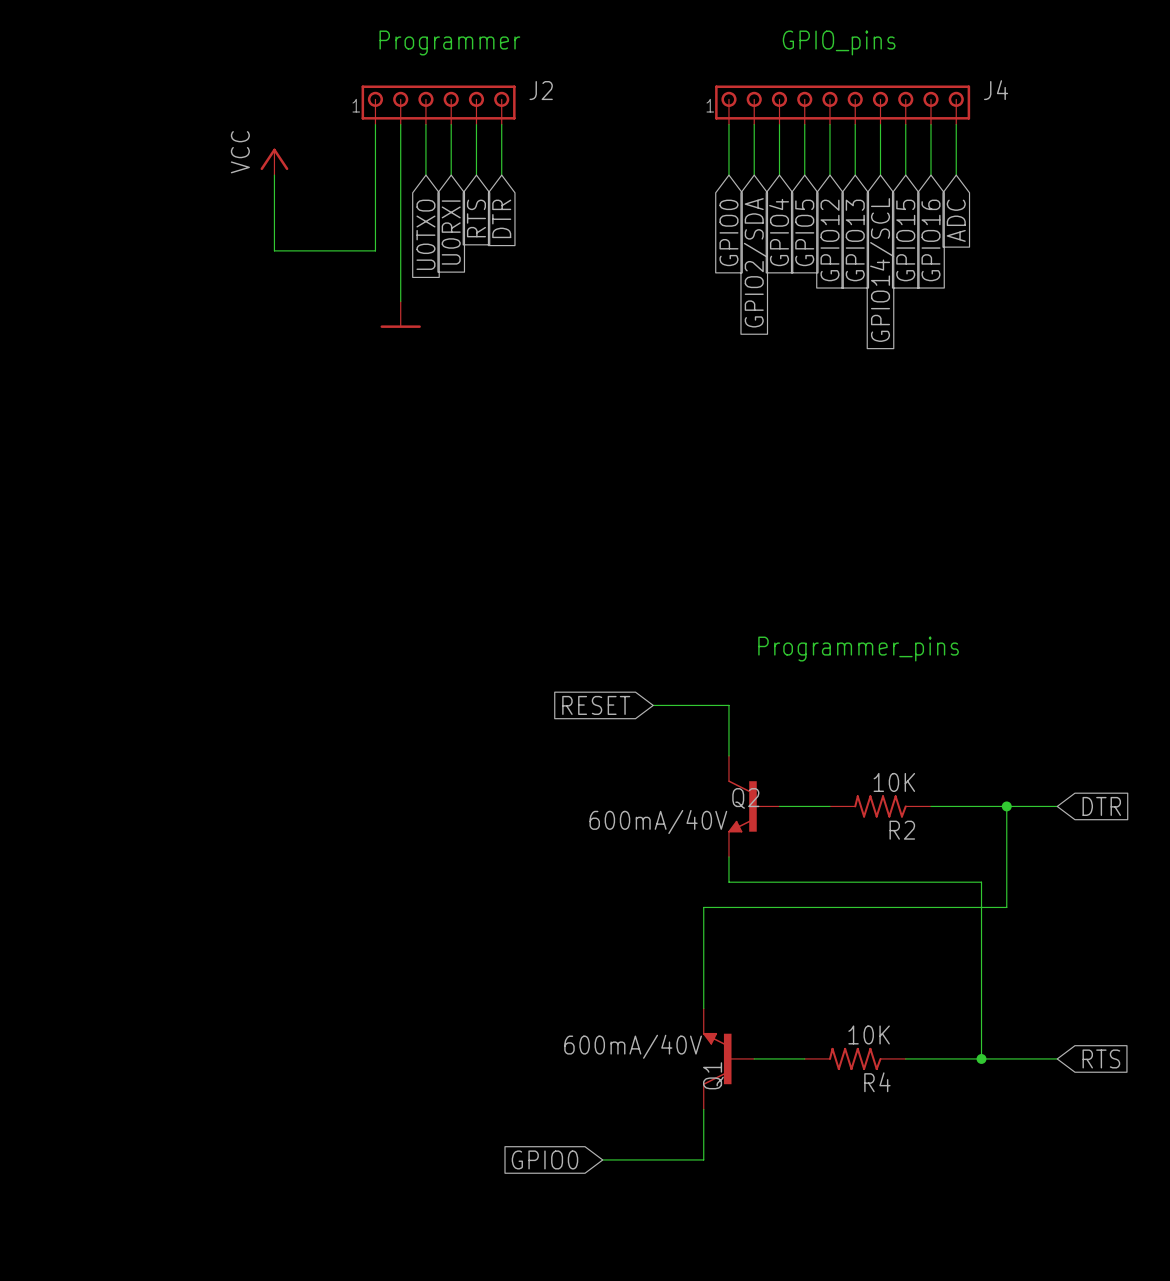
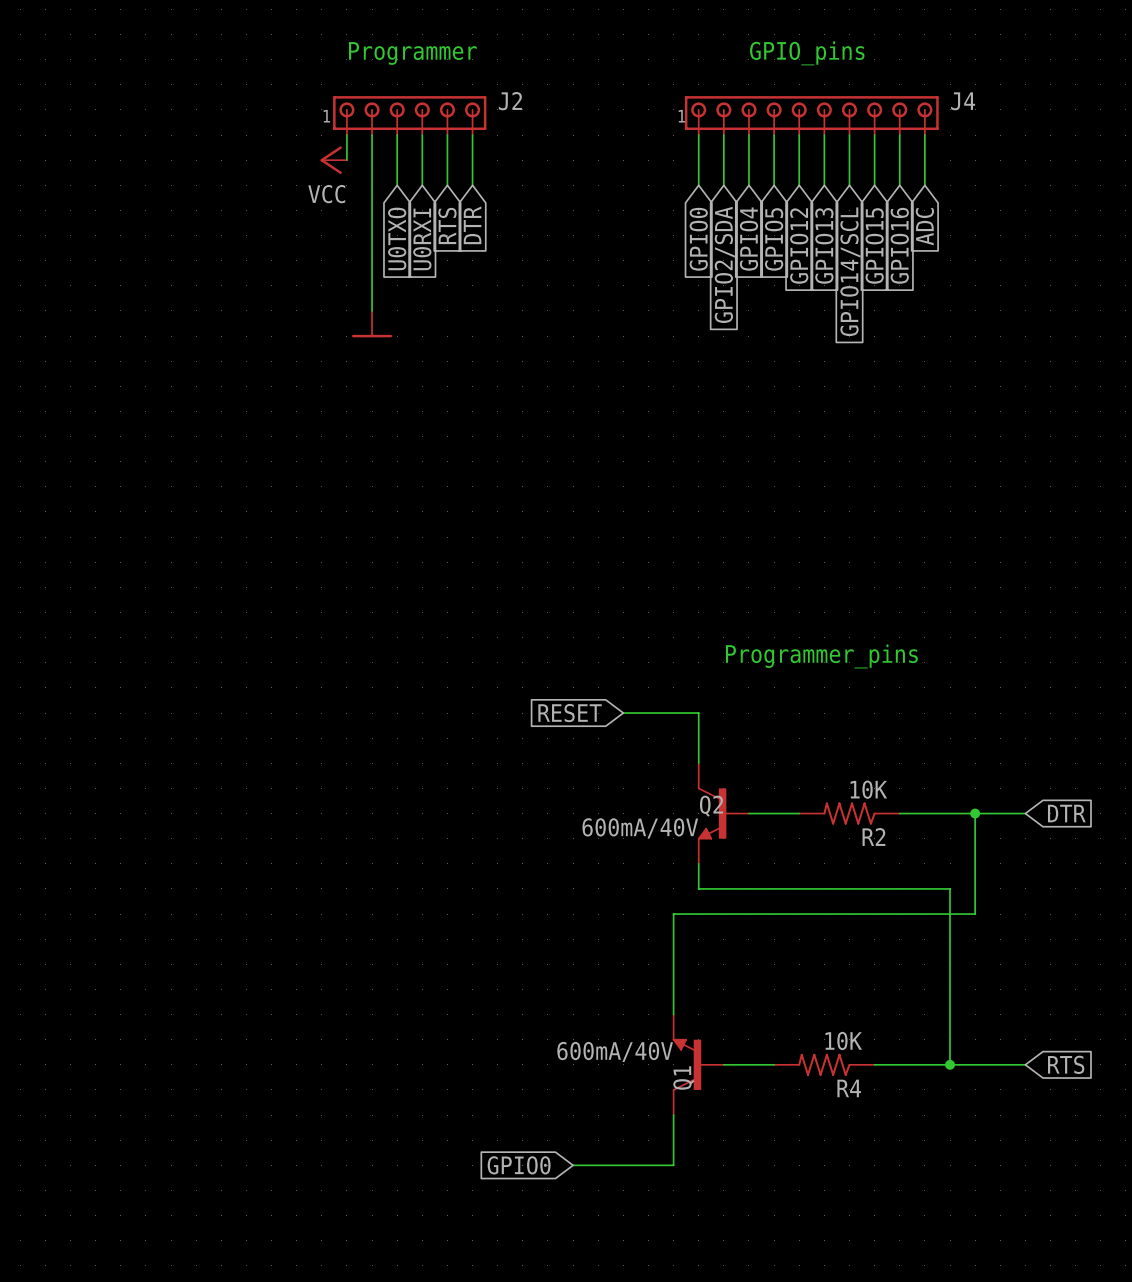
wire: (375, 149) (375, 250) (274, 250) (274, 175) -> none
power symbol rotation: 0° (274, 159) -> 90° counterclockwise (331, 160)
power symbol position: VCC (274, 161) -> VCC (333, 160)

